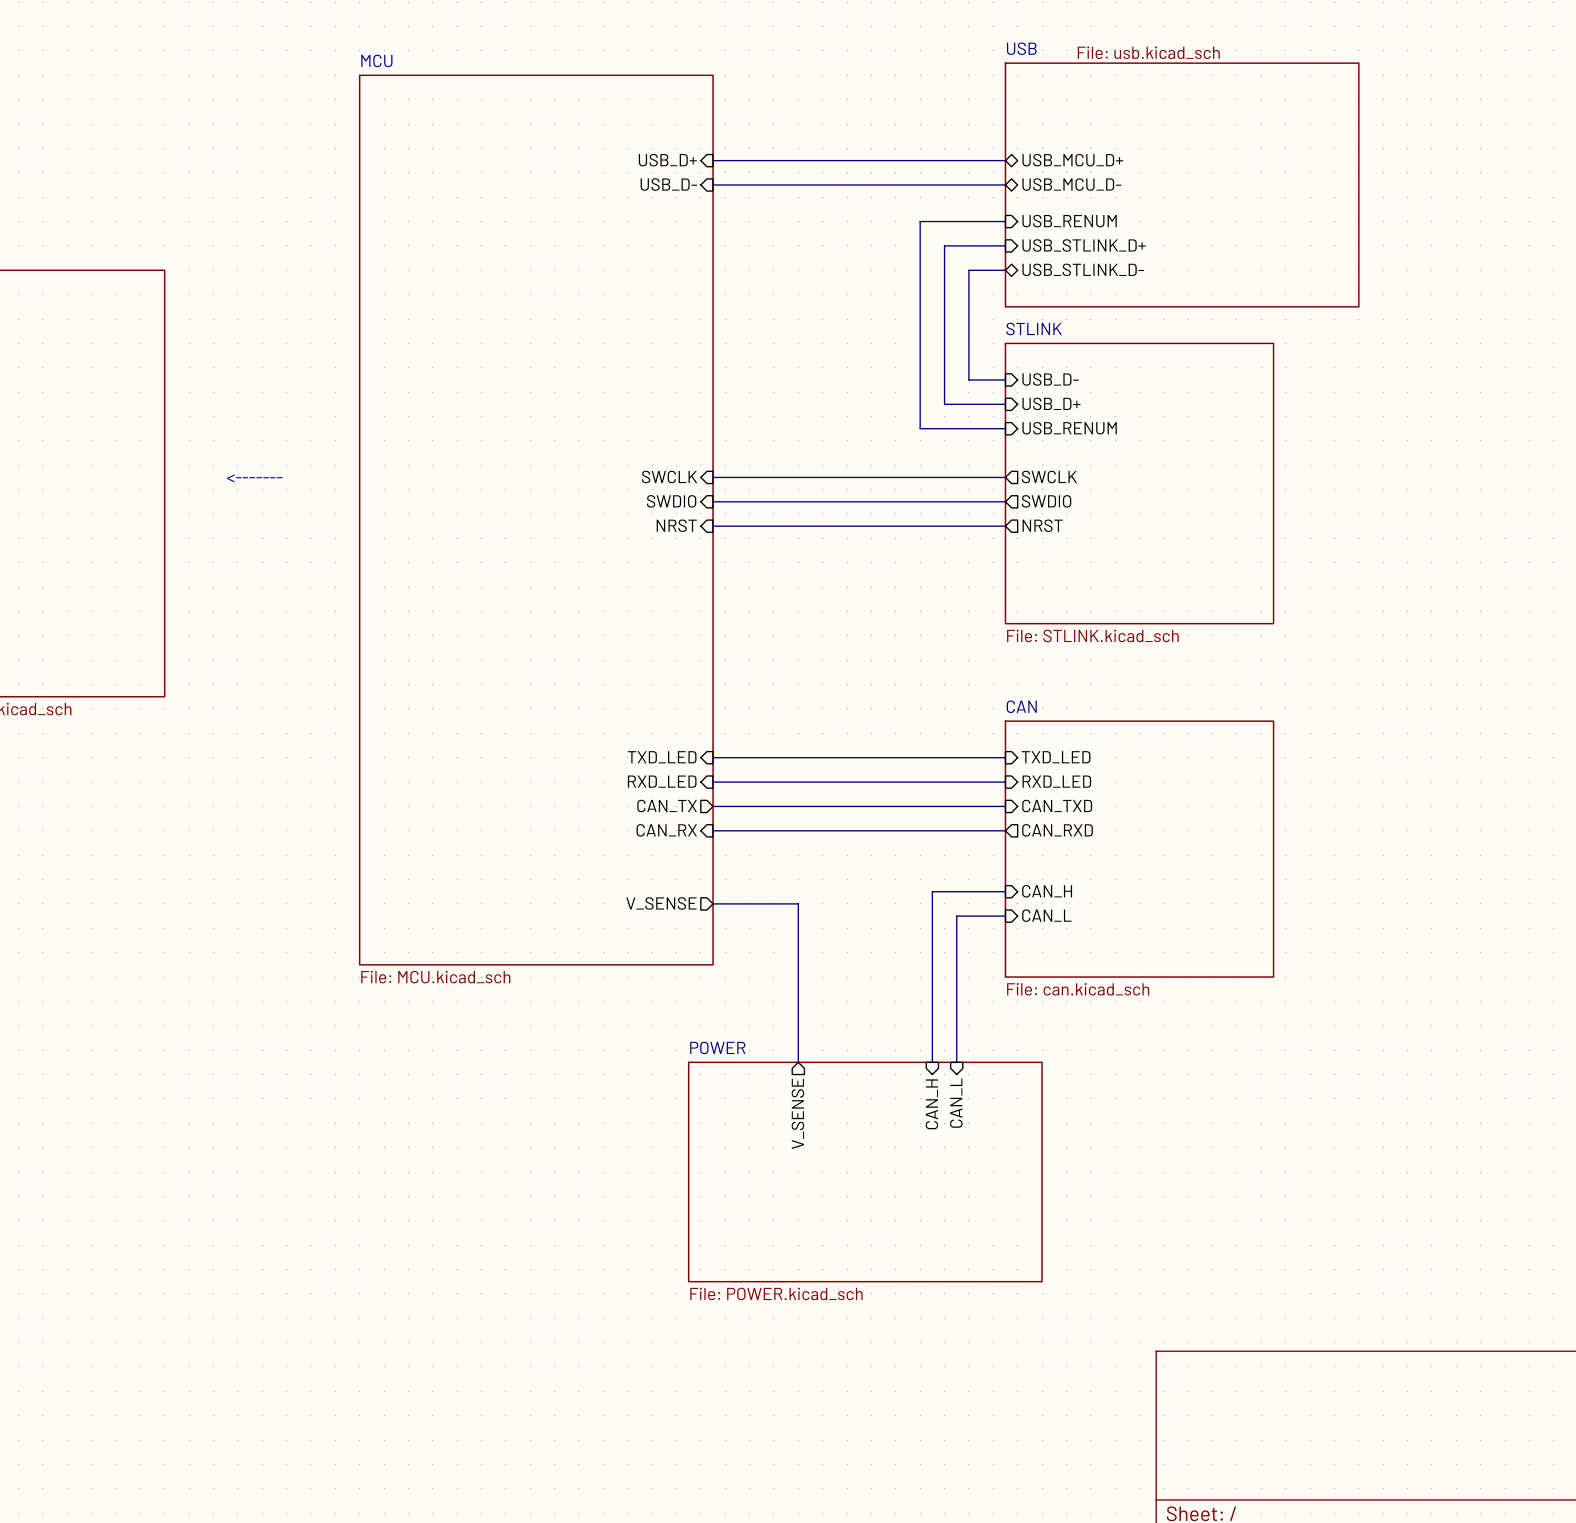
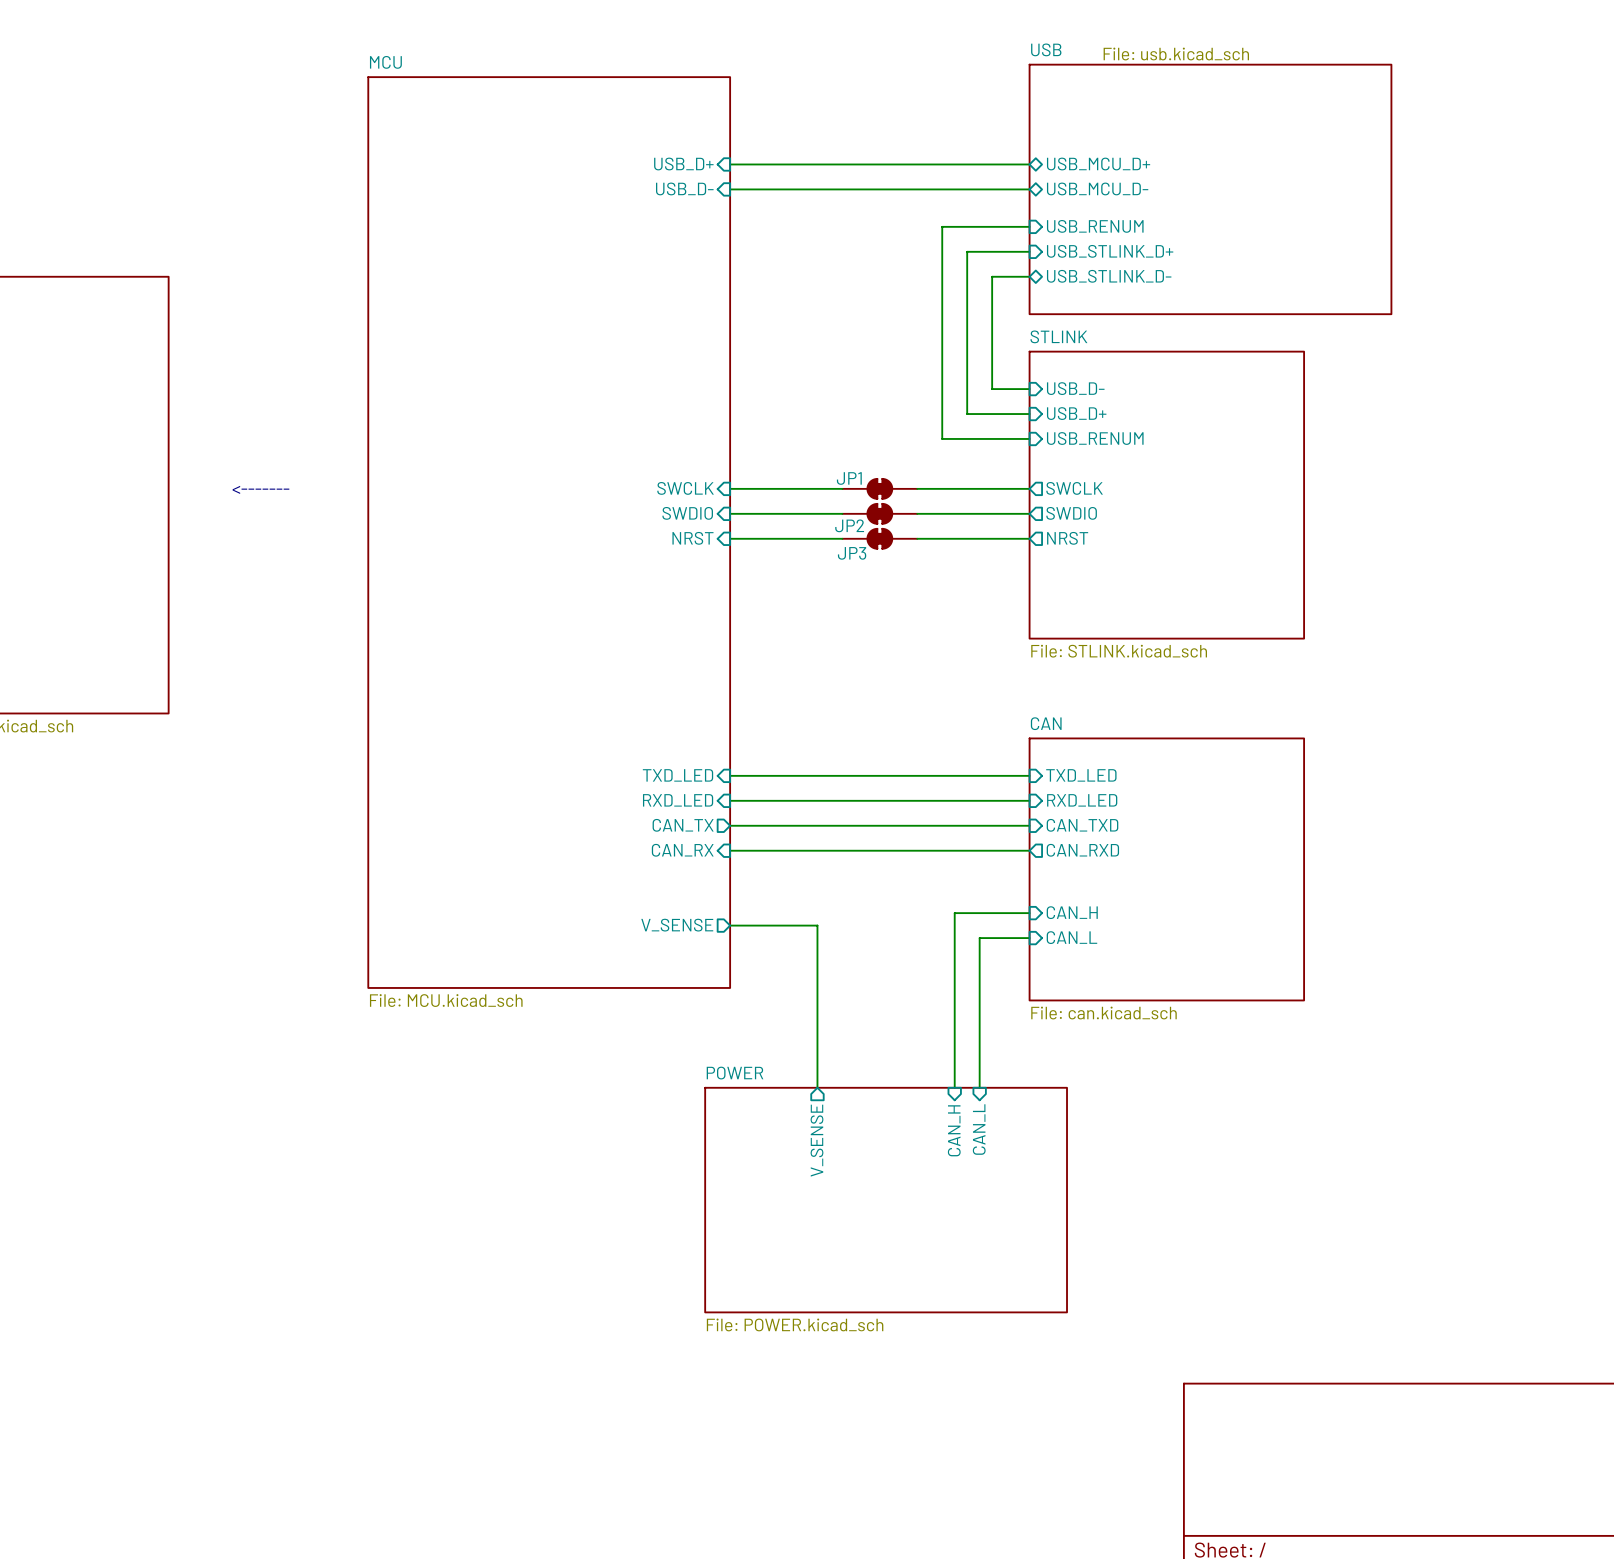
JP1: none -> (879, 488)
JP2: none -> (879, 513)
JP3: none -> (879, 538)

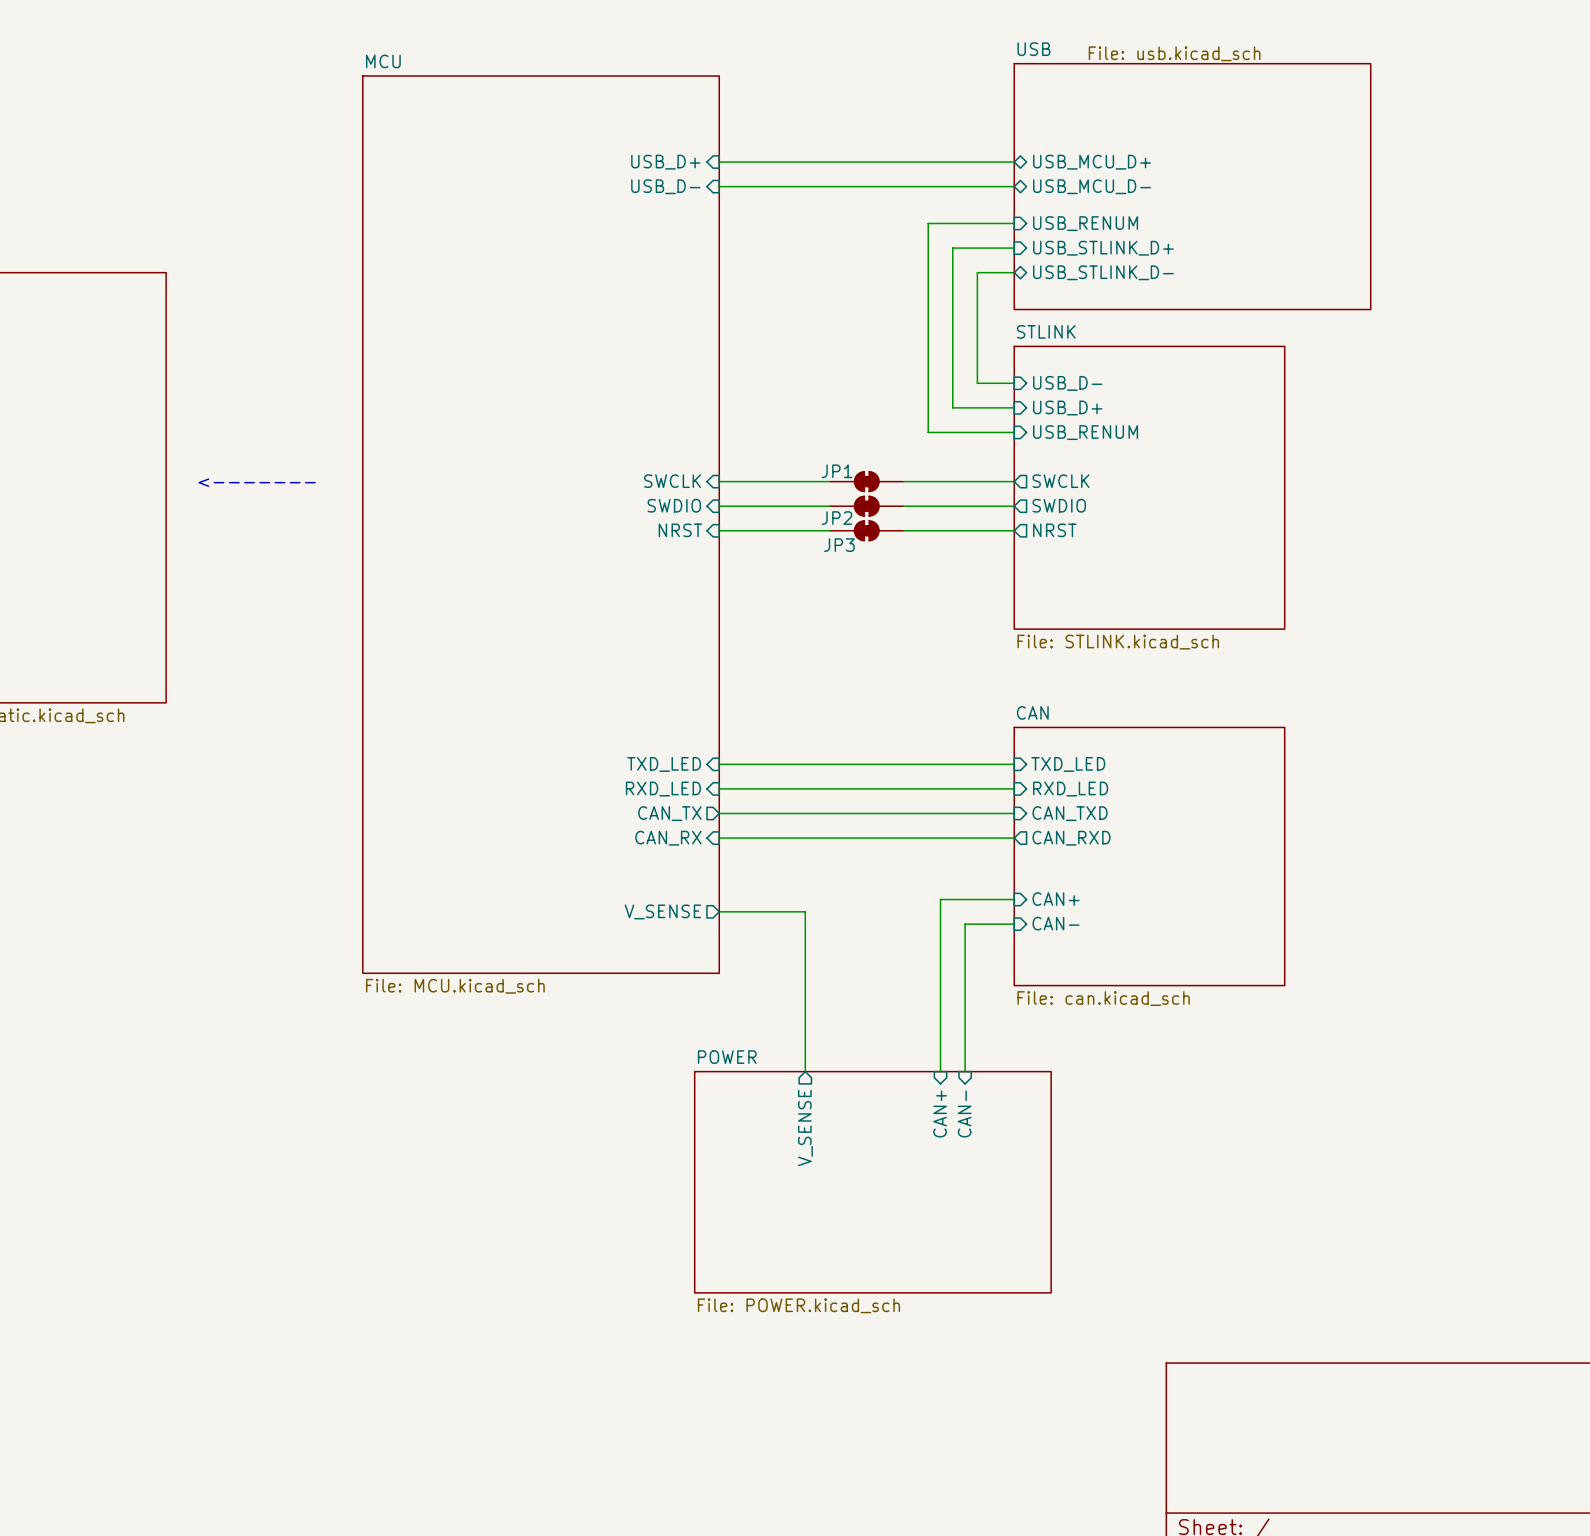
sheet pin: CAN_H (1072, 912) -> CAN+ (1056, 899)
sheet pin: CAN_L (1071, 937) -> CAN- (1056, 923)
sheet pin: CAN_L (979, 1129) -> CAN- (964, 1113)
sheet pin: CAN_H (954, 1130) -> CAN+ (940, 1113)

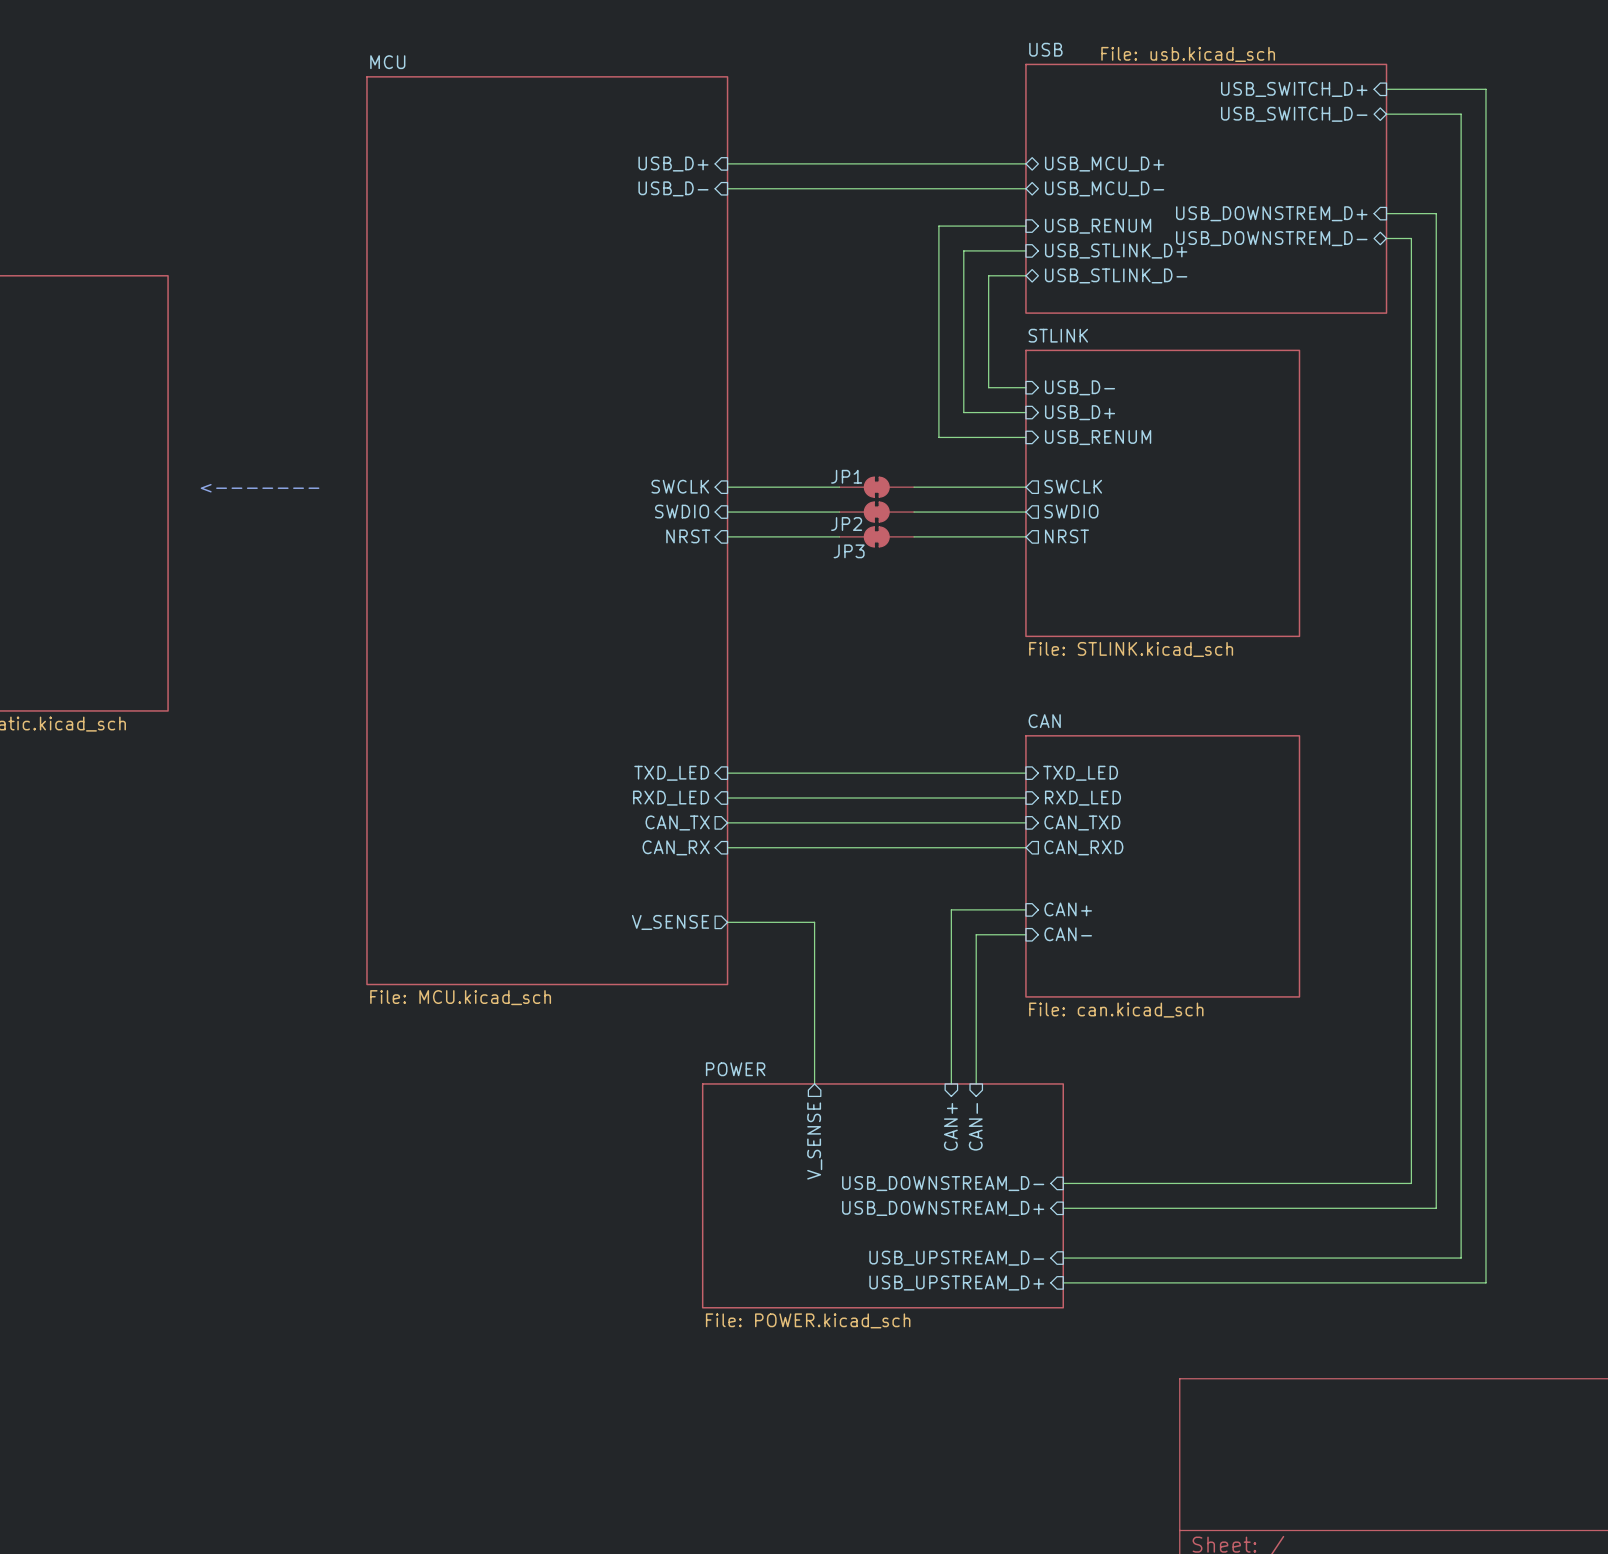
sheet pin: none -> USB_SWITCH_D+ (1294, 89)
wire: none -> (1386, 89) (1485, 89) (1485, 1282) (1063, 1282)
sheet pin: none -> USB_SWITCH_D- (1294, 114)
wire: none -> (1386, 114) (1461, 114) (1461, 1258) (1063, 1258)
sheet pin: none -> USB_DOWNSTREM_D+ (1271, 213)
wire: none -> (1386, 213) (1436, 213) (1436, 1208) (1063, 1208)
sheet pin: none -> USB_DOWNSTREM_D- (1271, 238)
wire: none -> (1386, 238) (1411, 238) (1411, 1183) (1063, 1183)
sheet pin: none -> USB_DOWNSTREAM_D- (943, 1183)
sheet pin: none -> USB_DOWNSTREAM_D+ (943, 1208)
sheet pin: none -> USB_UPSTREAM_D- (956, 1258)
sheet pin: none -> USB_UPSTREAM_D+ (956, 1283)

